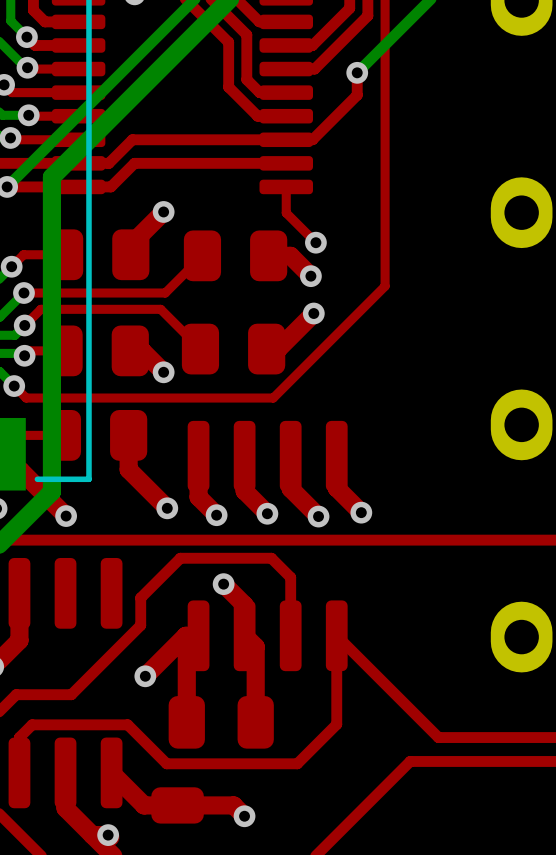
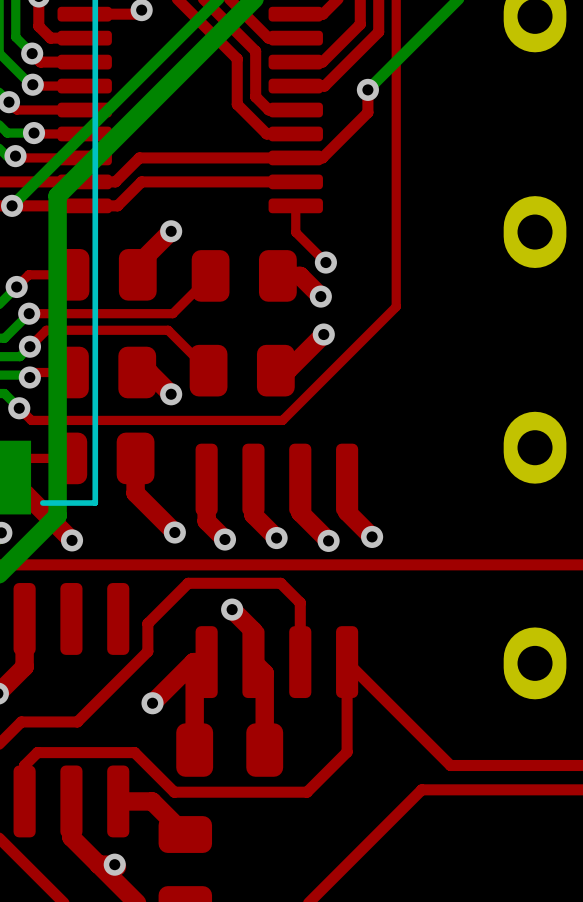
top track: (111, 772) (144, 805) (233, 805) (244, 816) -> (118, 801) (152, 801) (185, 834)
via: (244, 816) -> none

